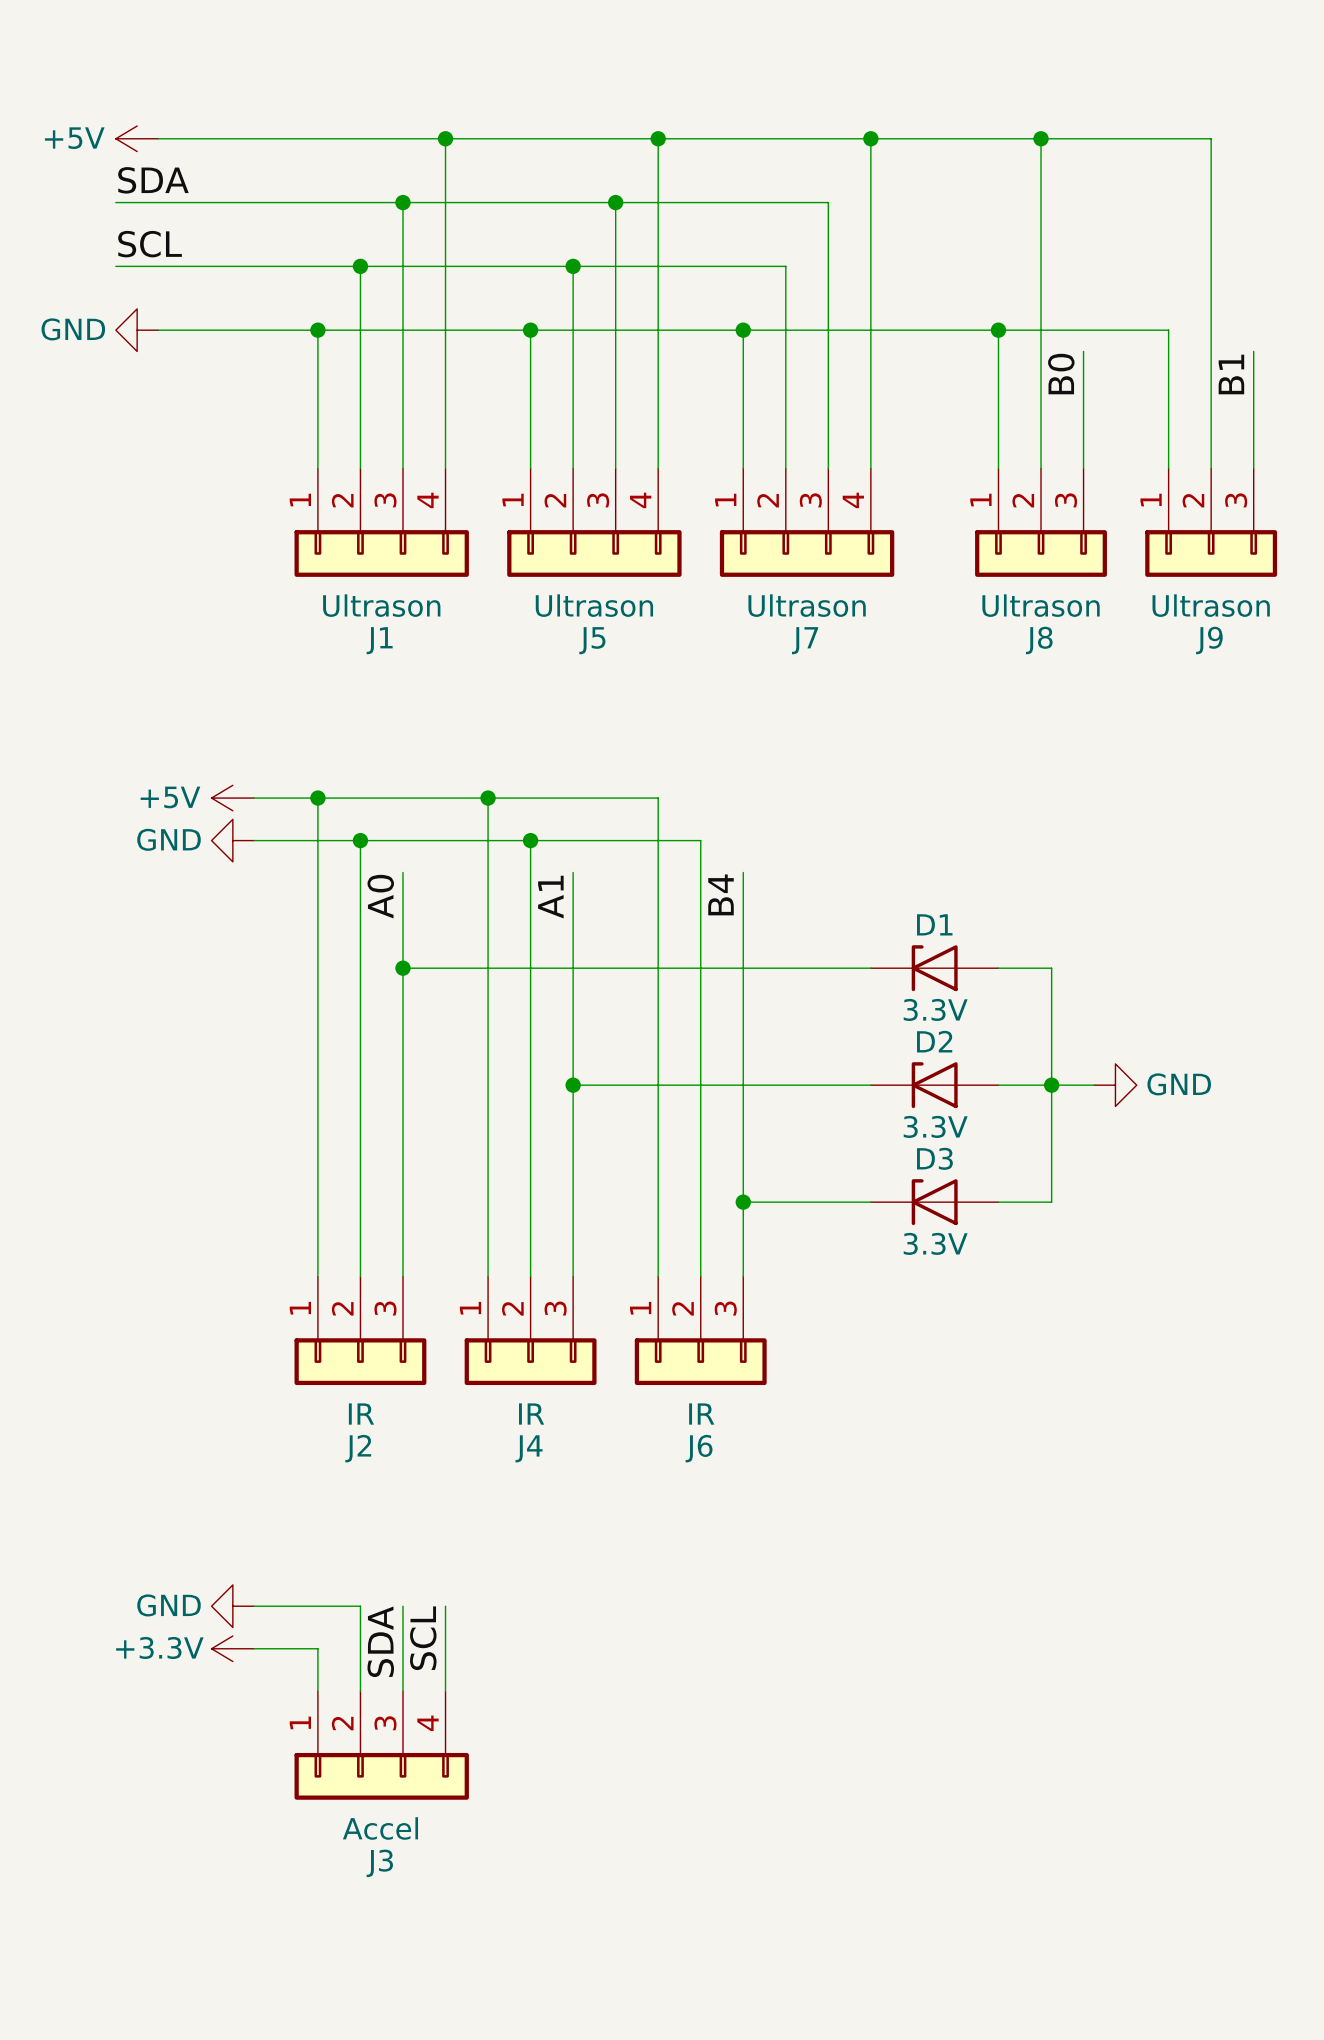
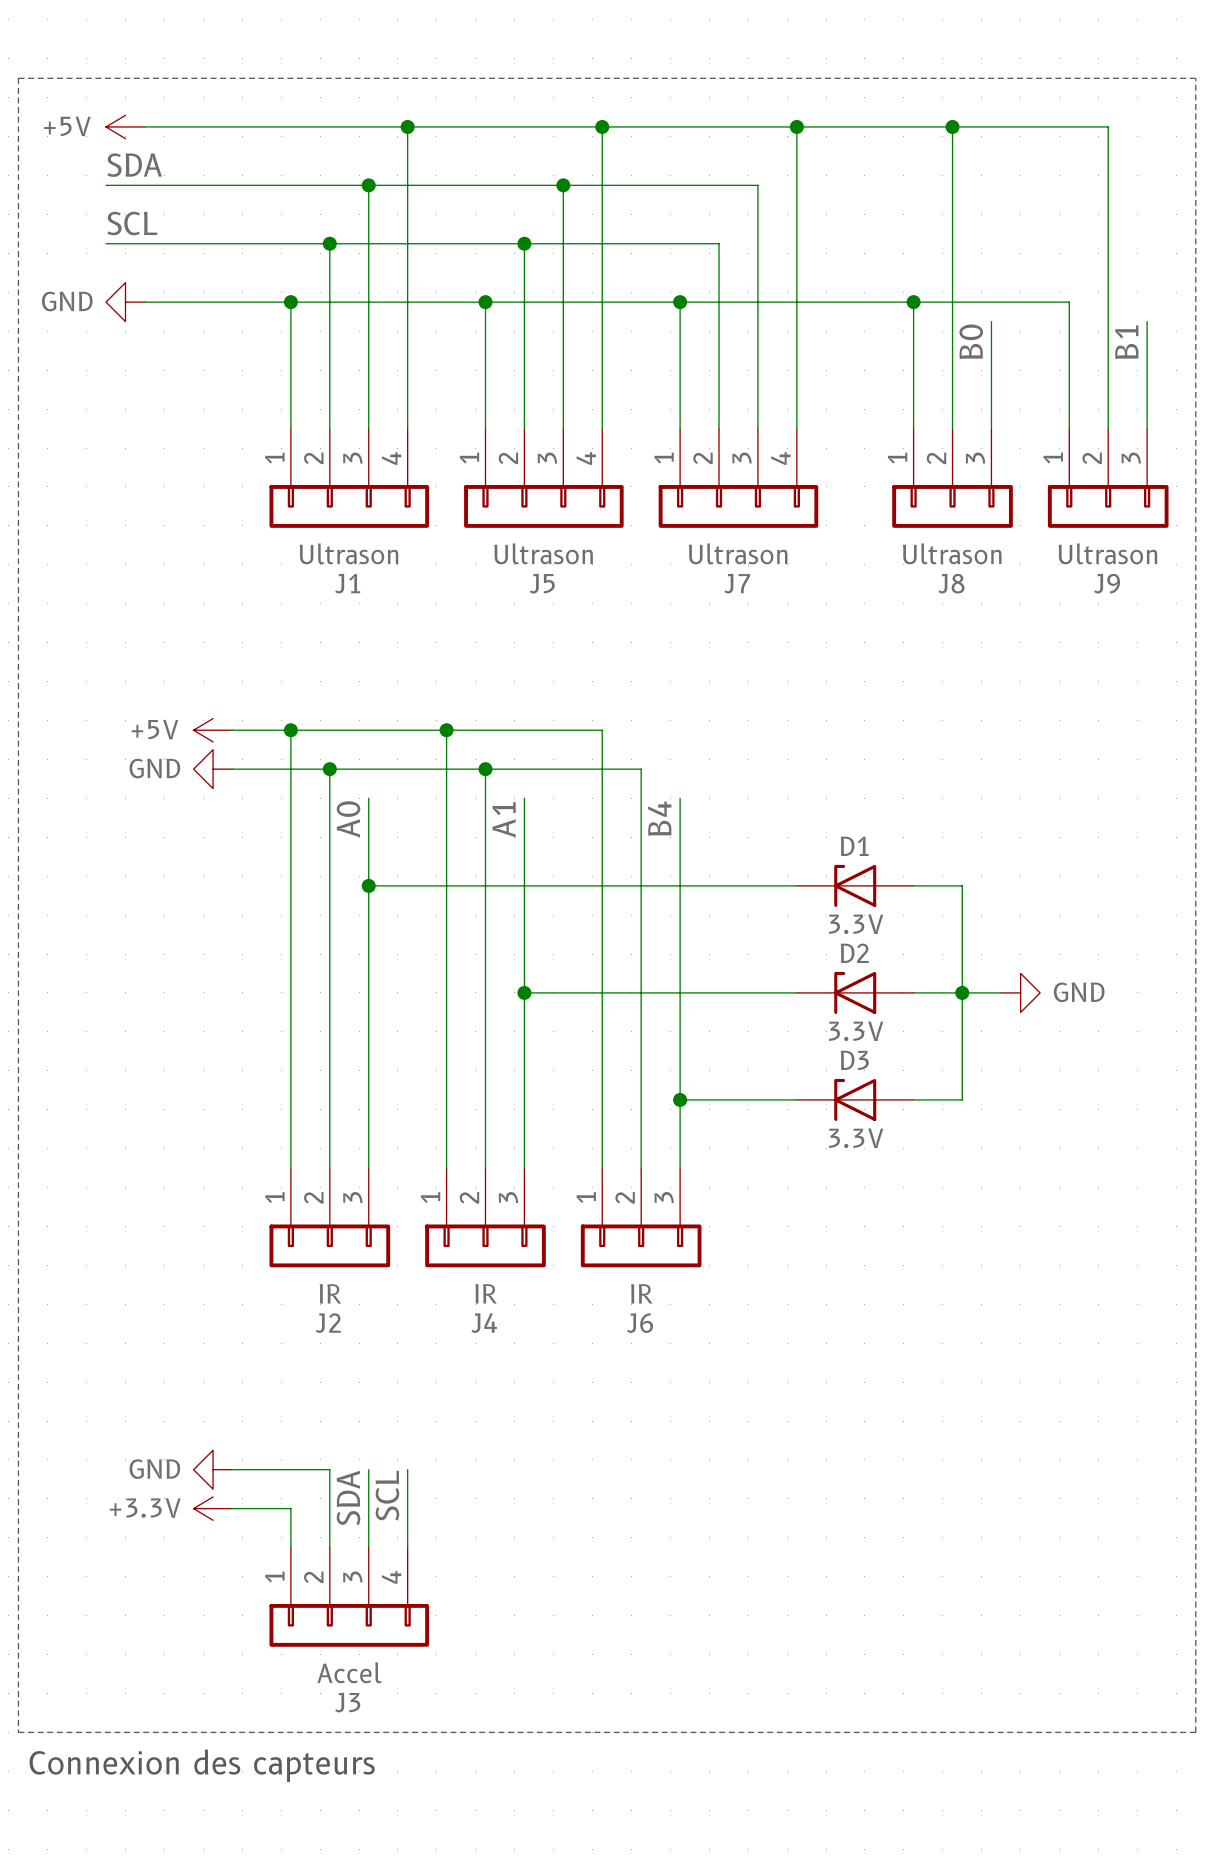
line: none -> (18, 78) (1195, 78) (1195, 1732) (18, 1732) (18, 78)
text: none -> Connexion des capteurs (202, 1765)

